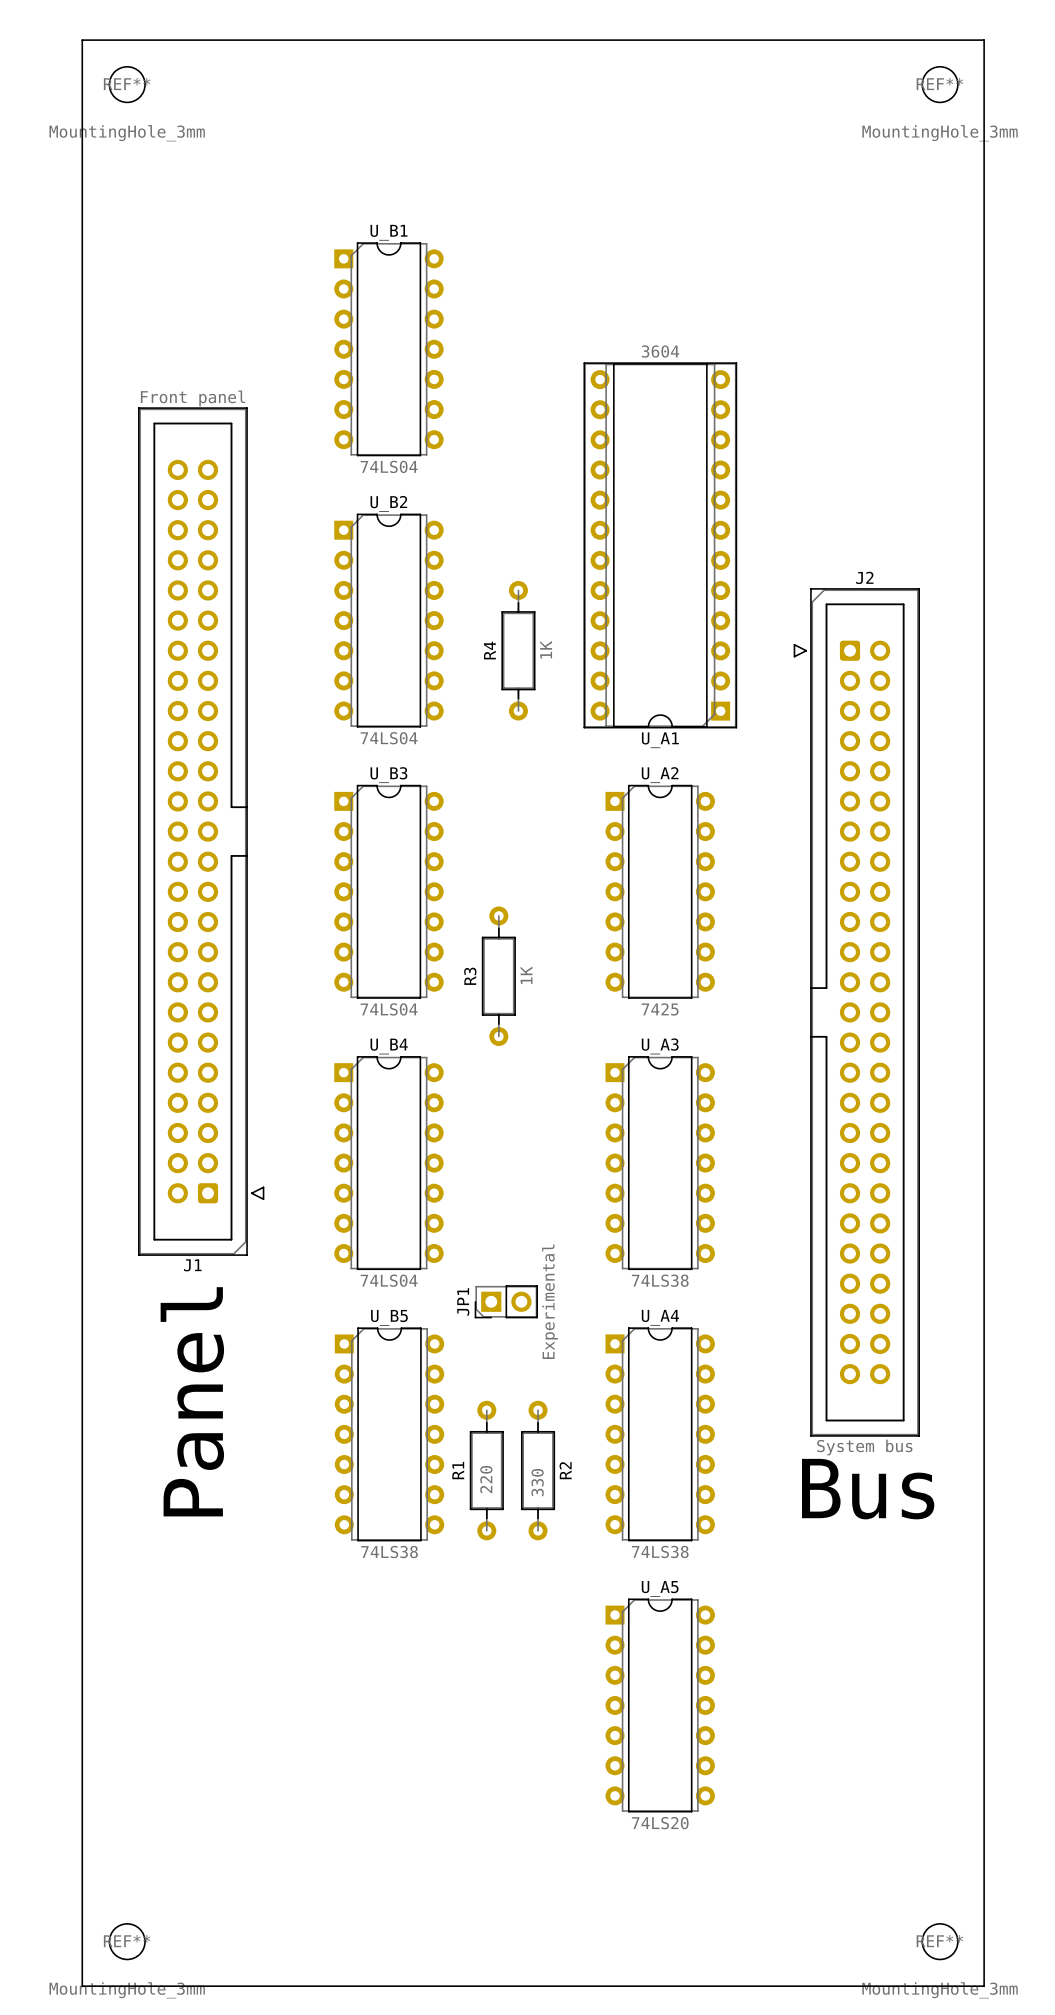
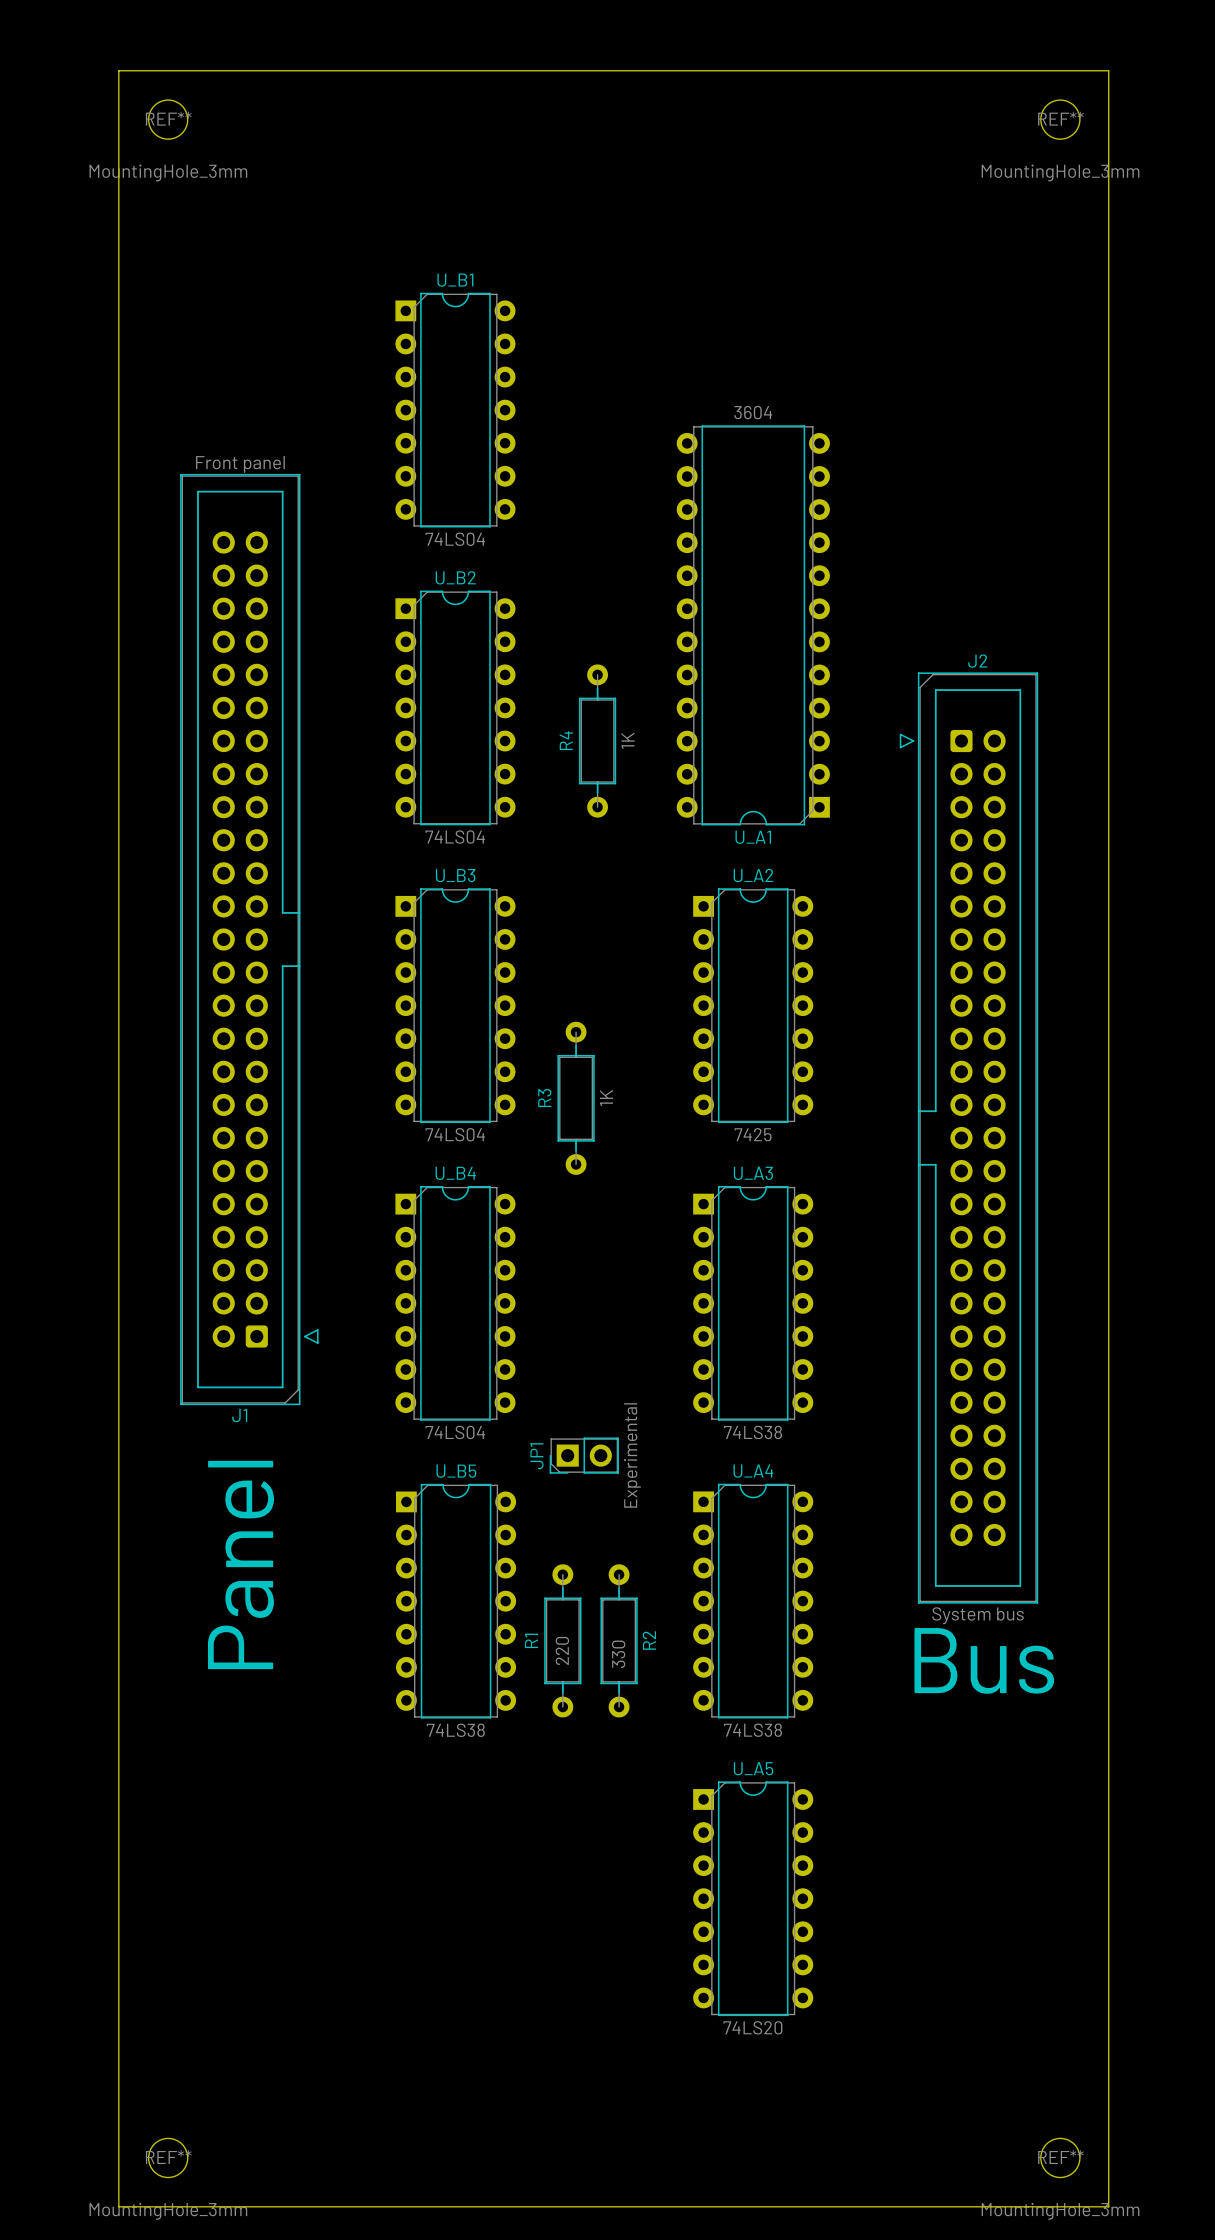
U_A1 footprint: [583, 362, 738, 729] -> [676, 425, 830, 826]

